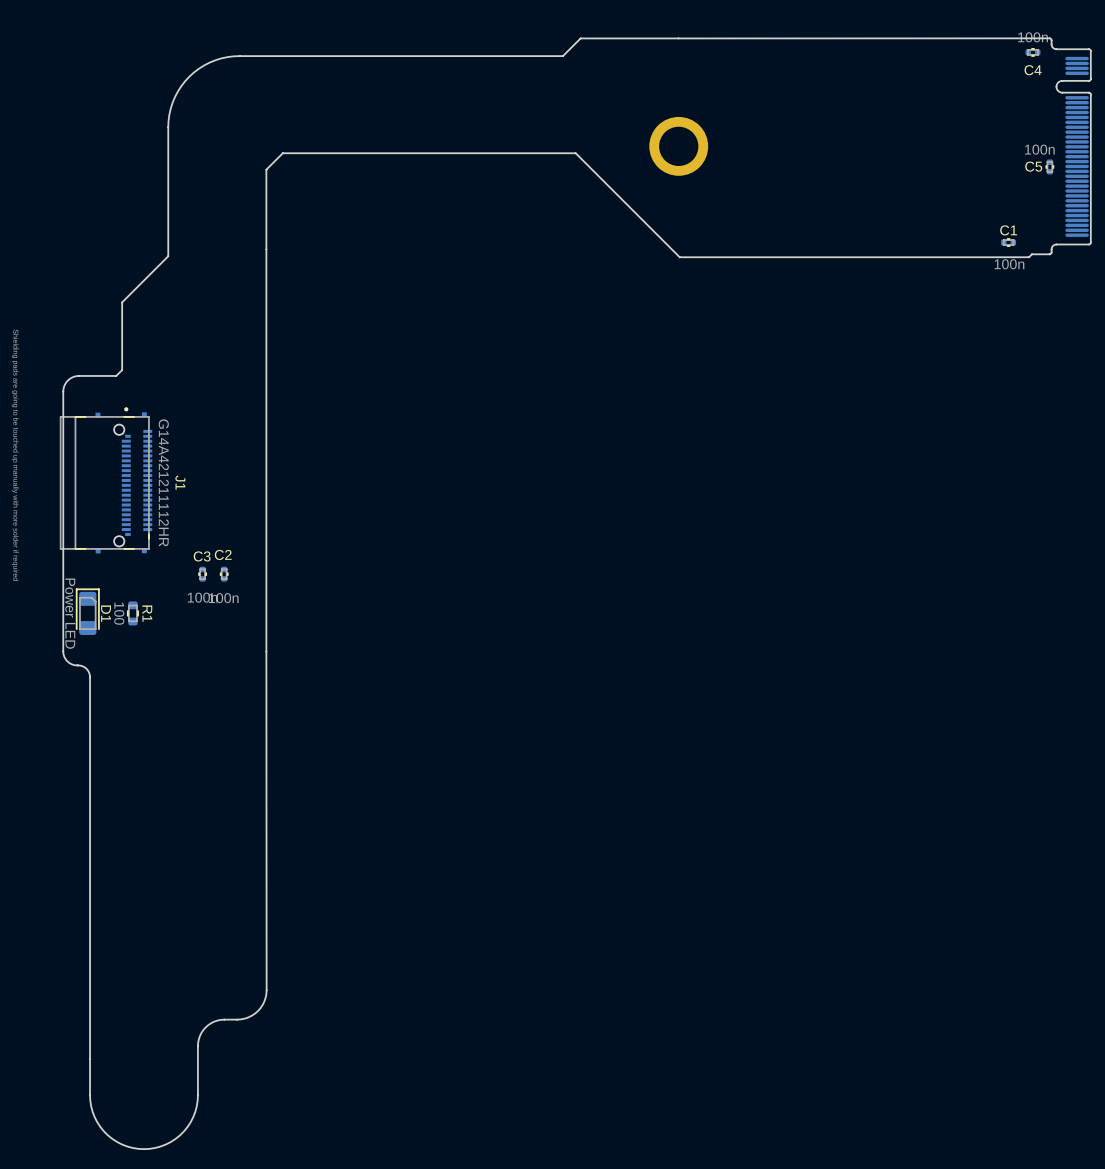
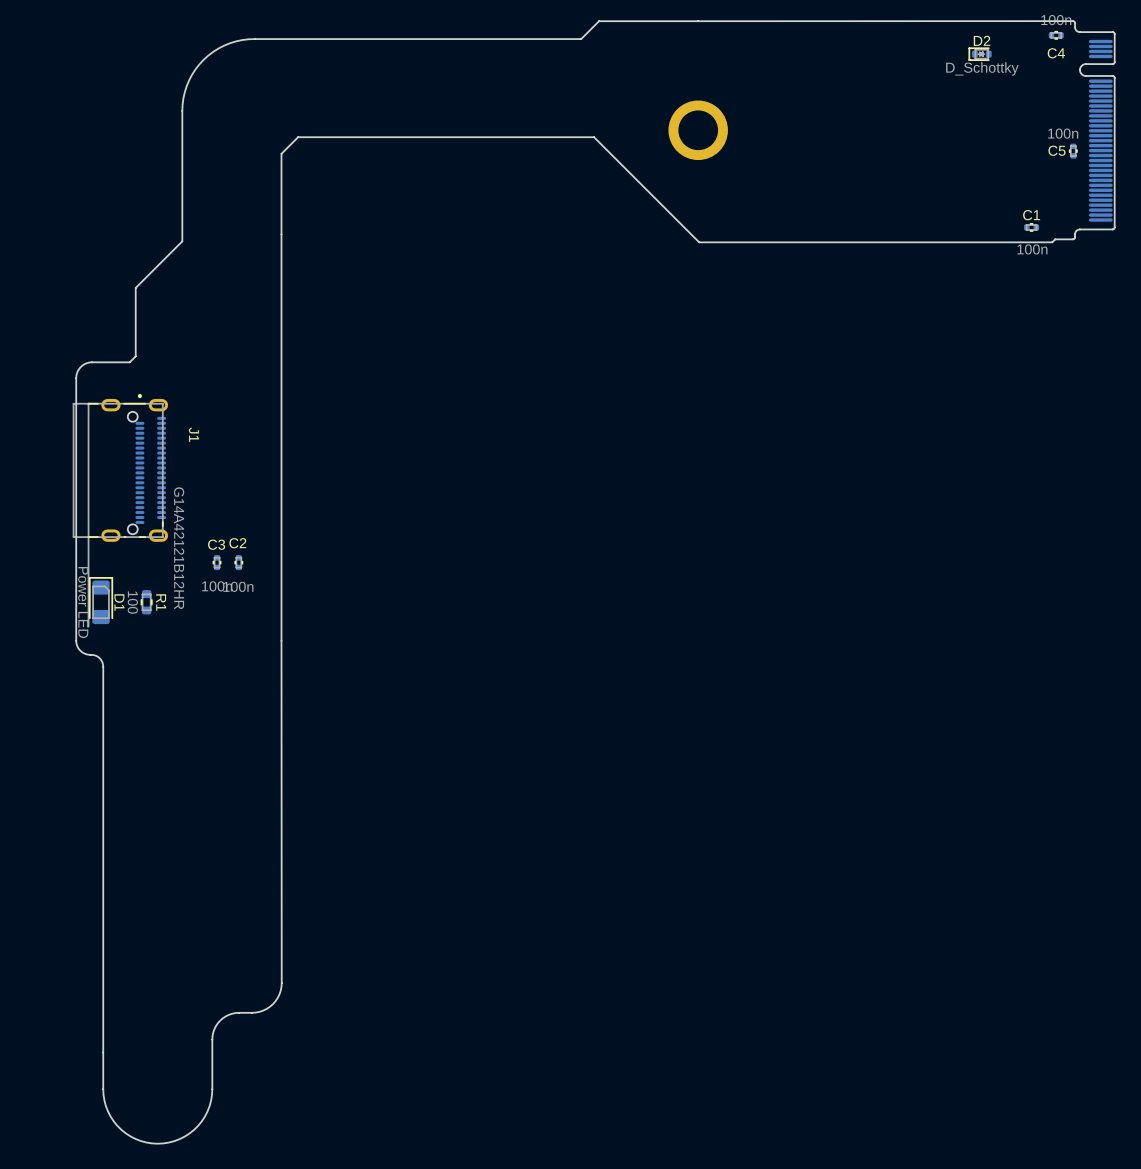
D2: none -> D_Schottky (980, 54)
J1 footprint: [60, 407, 153, 554] -> [72, 394, 169, 628]
J1 value: G14A421211112HR (163, 482) -> G14A42121B12HR (179, 548)
J1 name position: J1 (180, 482) -> J1 (193, 434)

